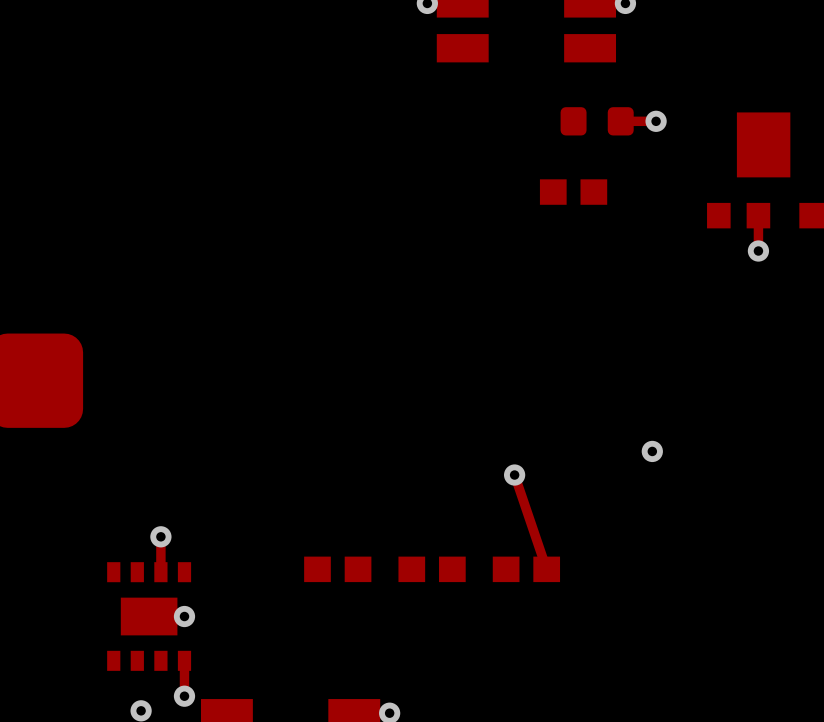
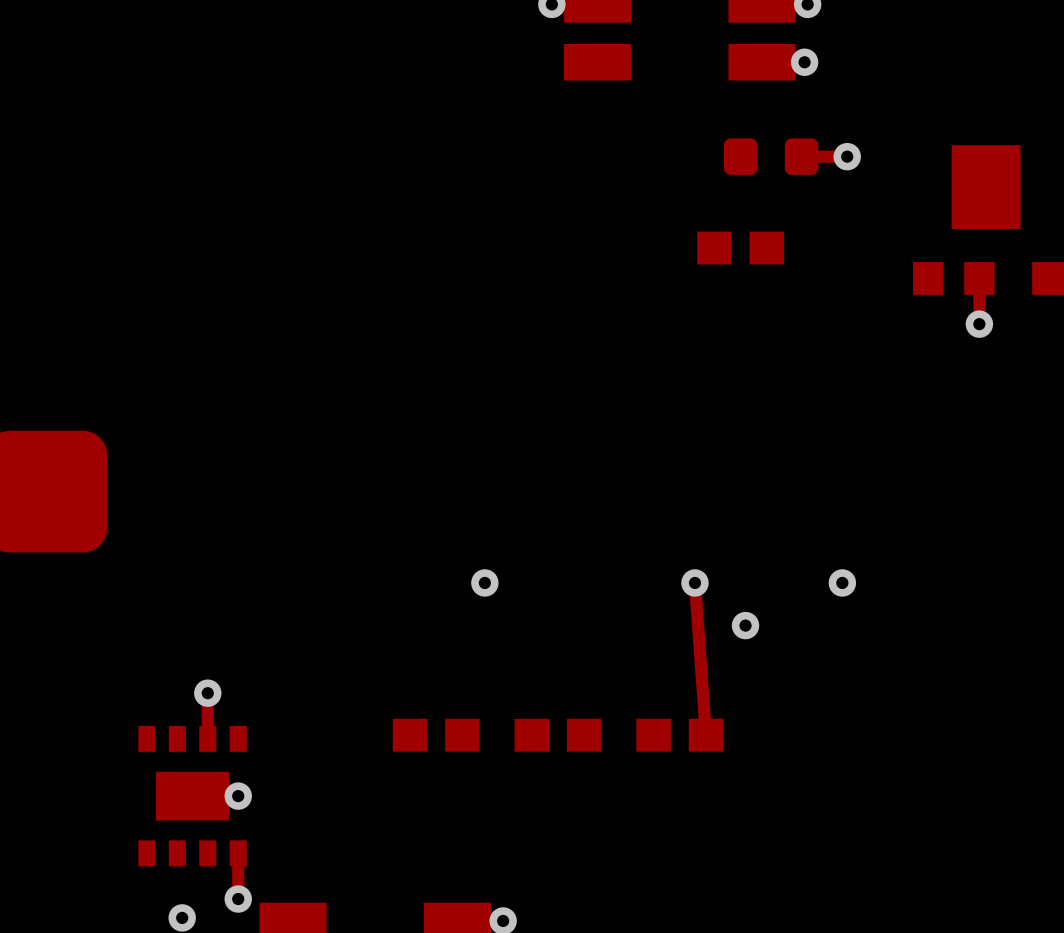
via: none -> (804, 62)
via: none -> (484, 582)
via: none -> (694, 582)
track: (514, 475) (546, 569) -> (694, 582) (705, 735)
via: (514, 475) -> none
via: none -> (745, 625)

